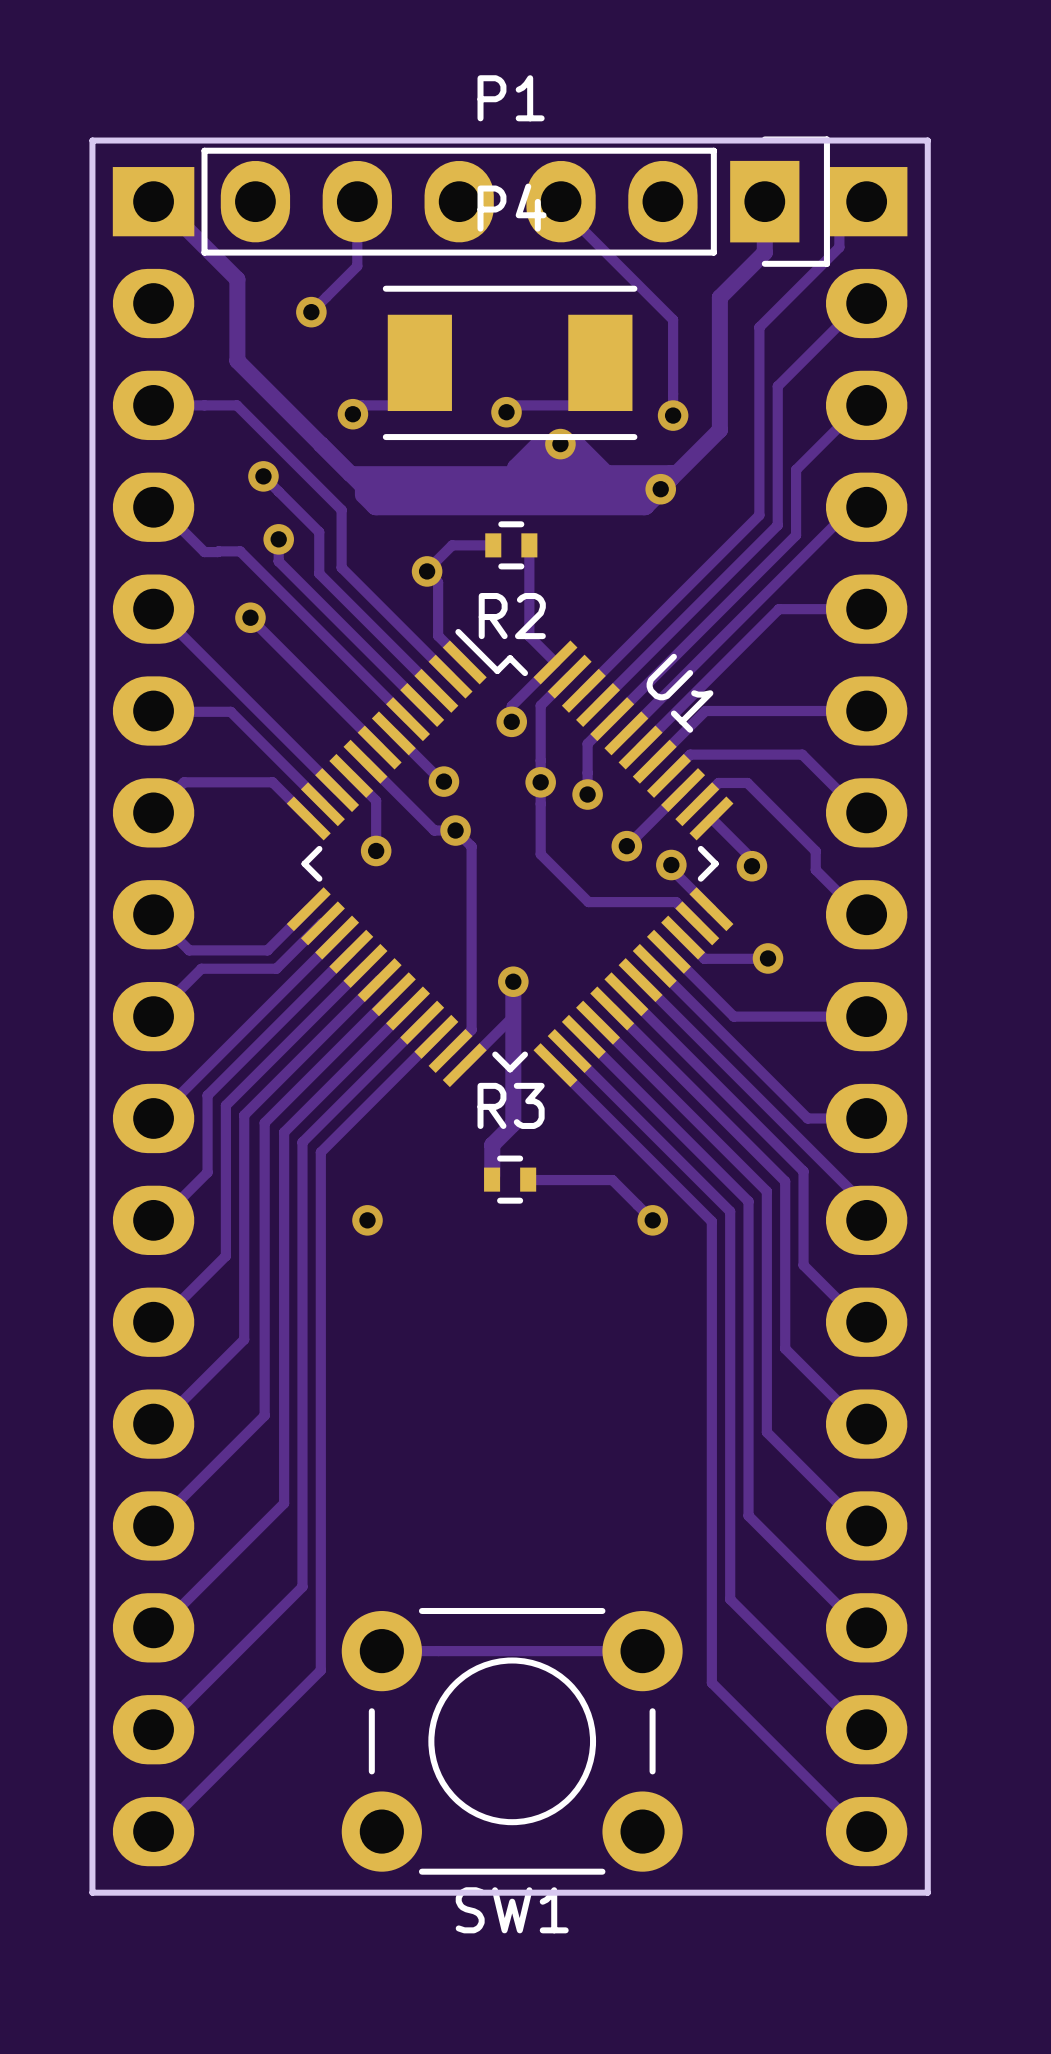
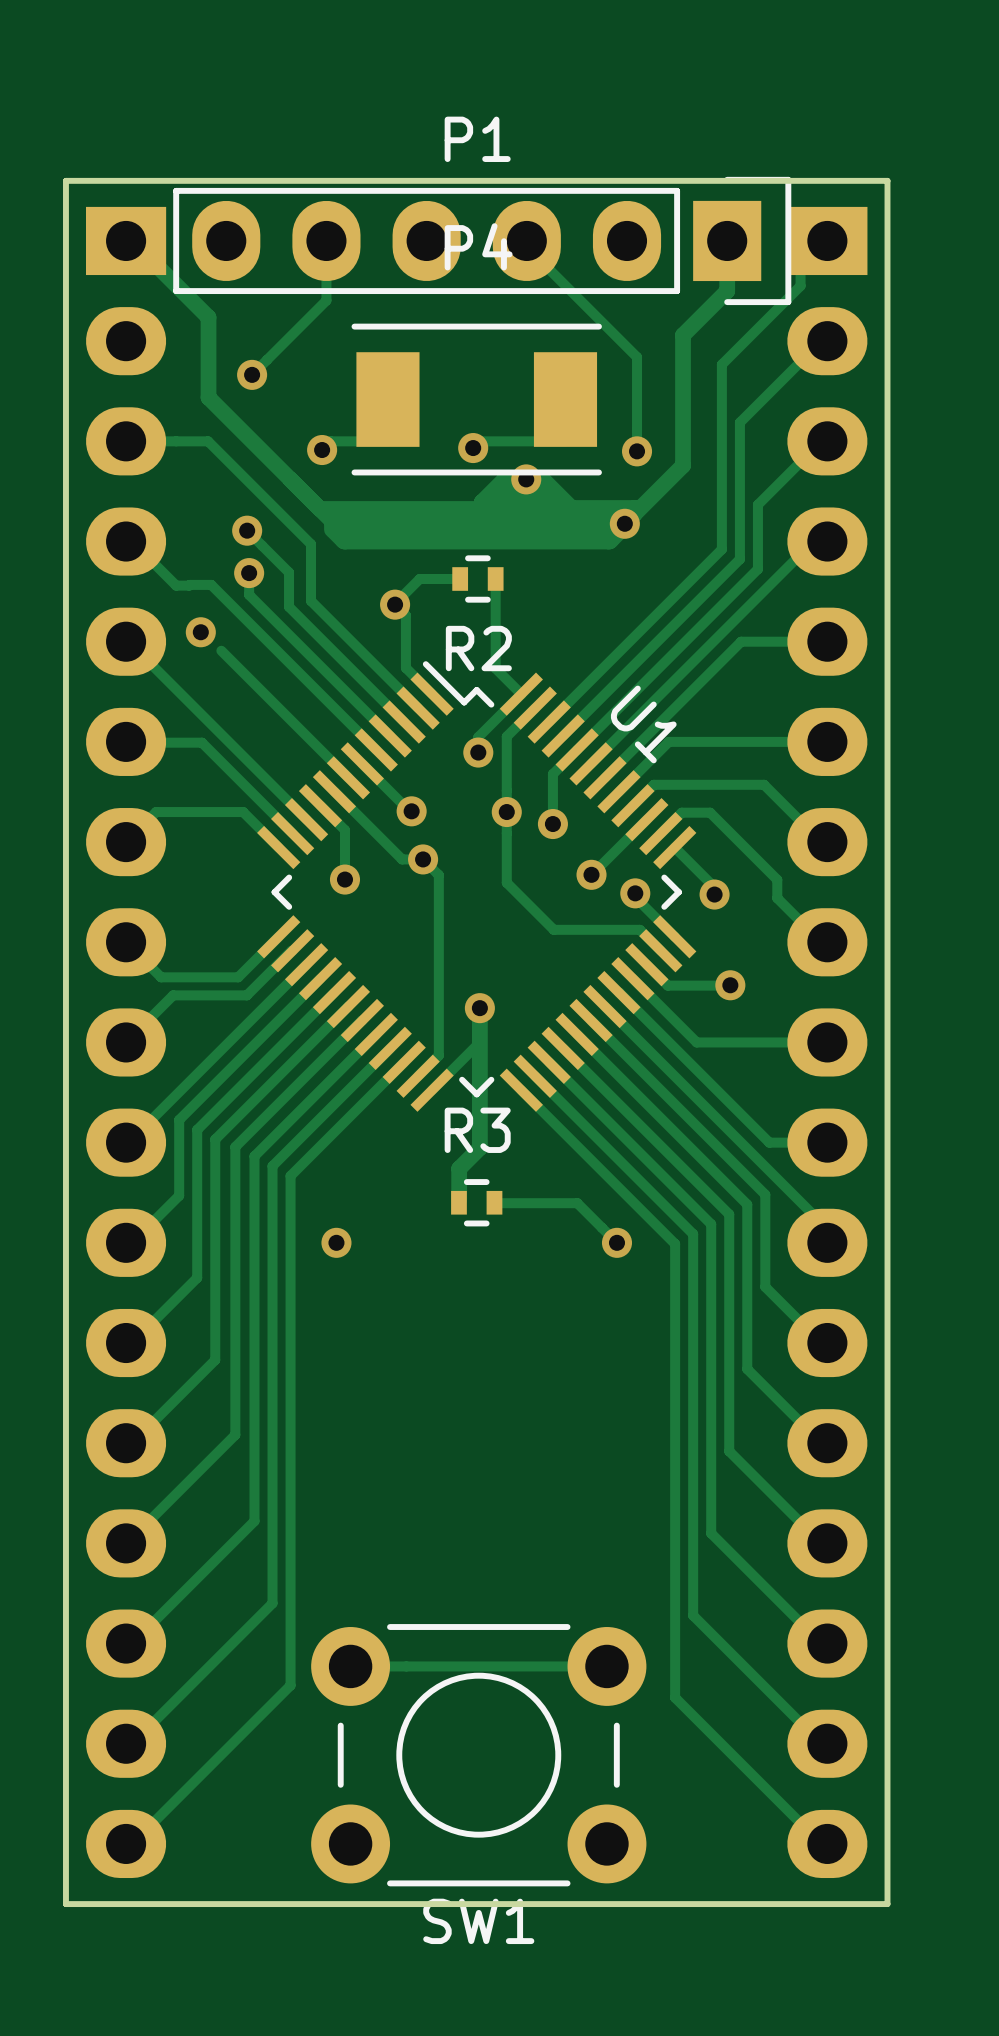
track: (357, 262) (357, 266) (311, 312) -> (326, 300) (252, 374)
via position: (311, 312) -> (252, 374)
track: (263, 476) (319, 532) (319, 538) -> (247, 530) (289, 572)
via position: (263, 476) -> (247, 530)
via position: (250, 617) -> (200, 632)

